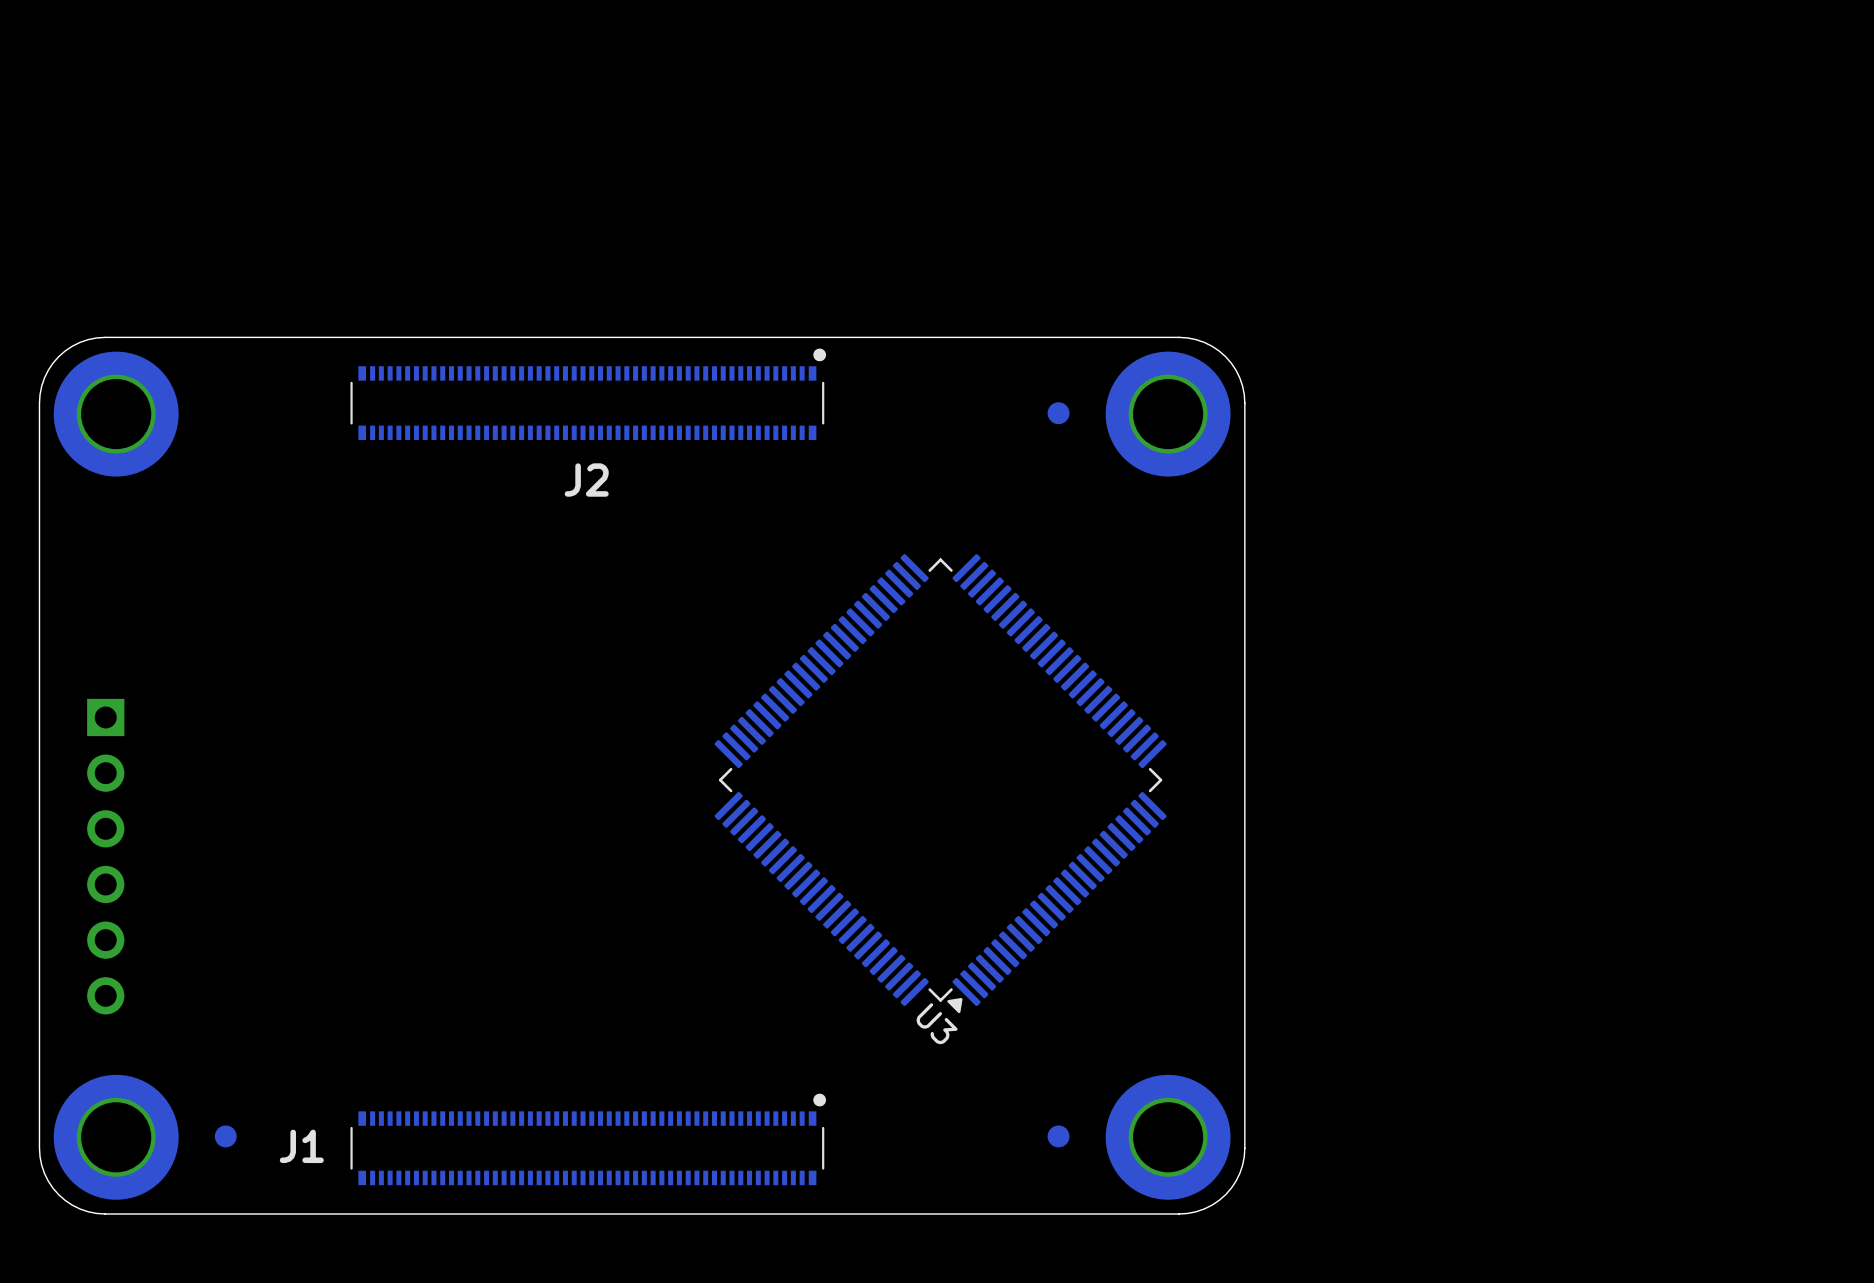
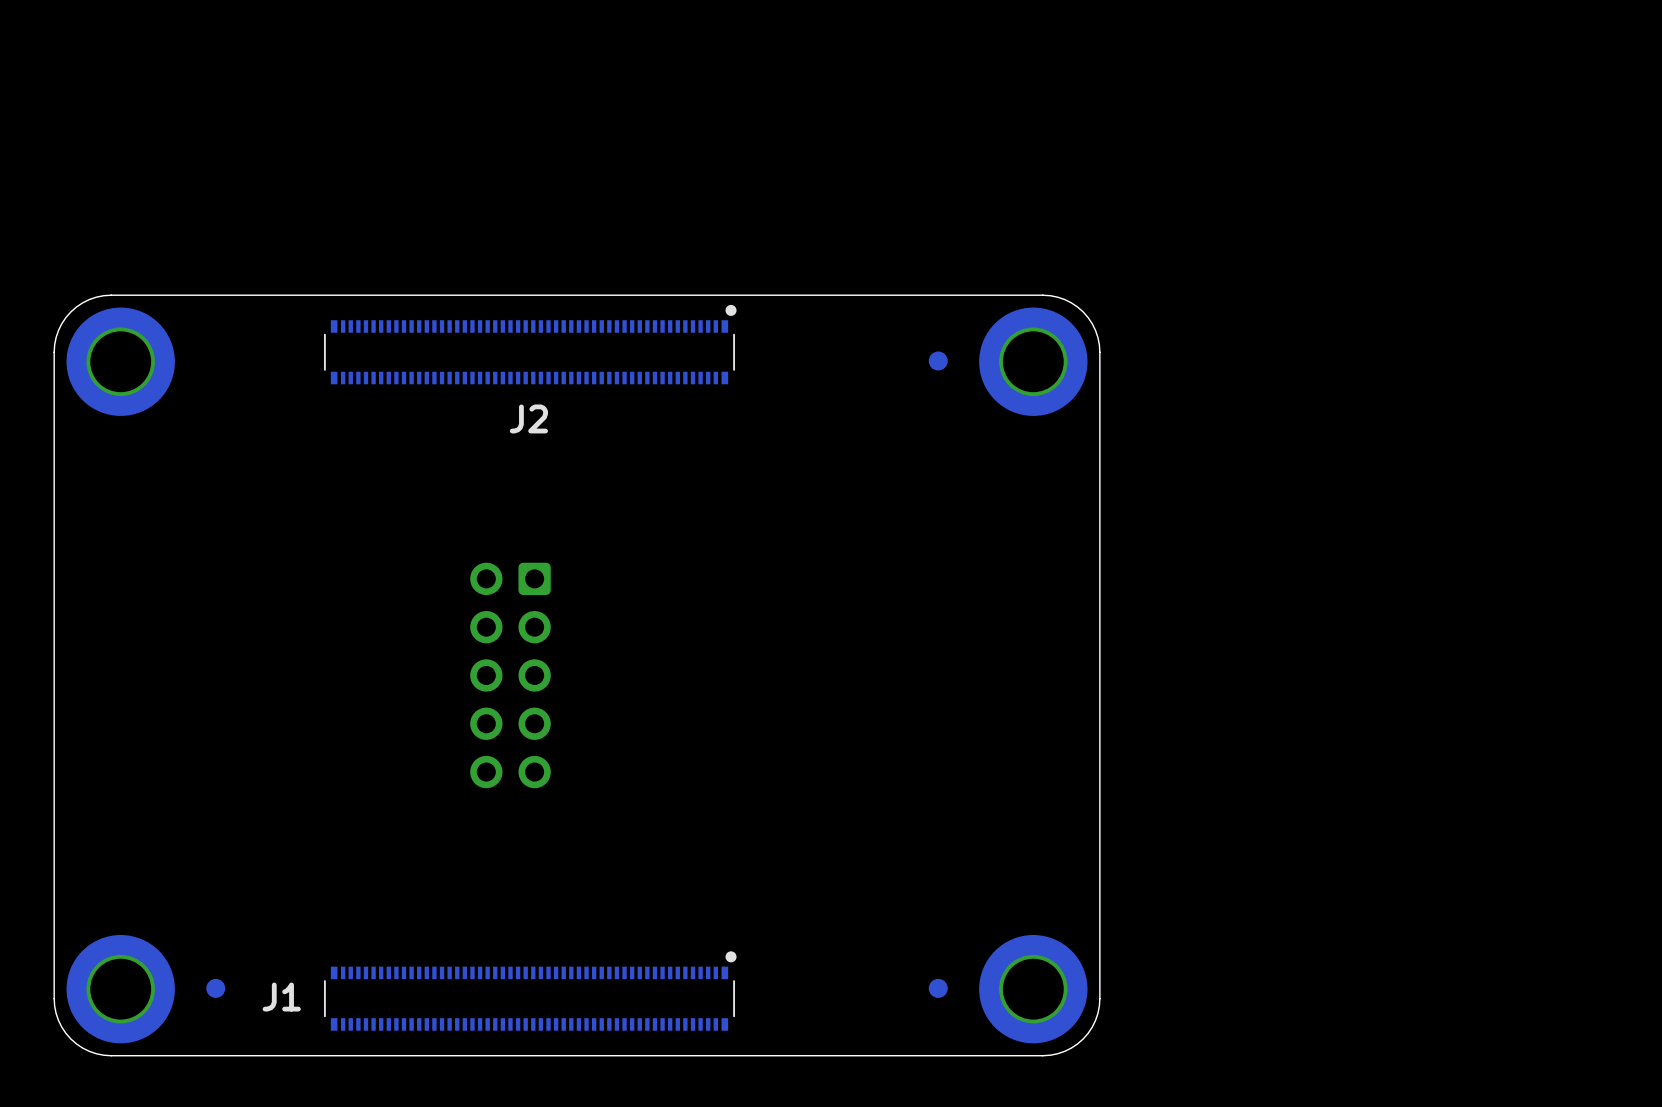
part: none -> (510, 675)
U3: (940, 783) -> none
part: (105, 856) -> none

